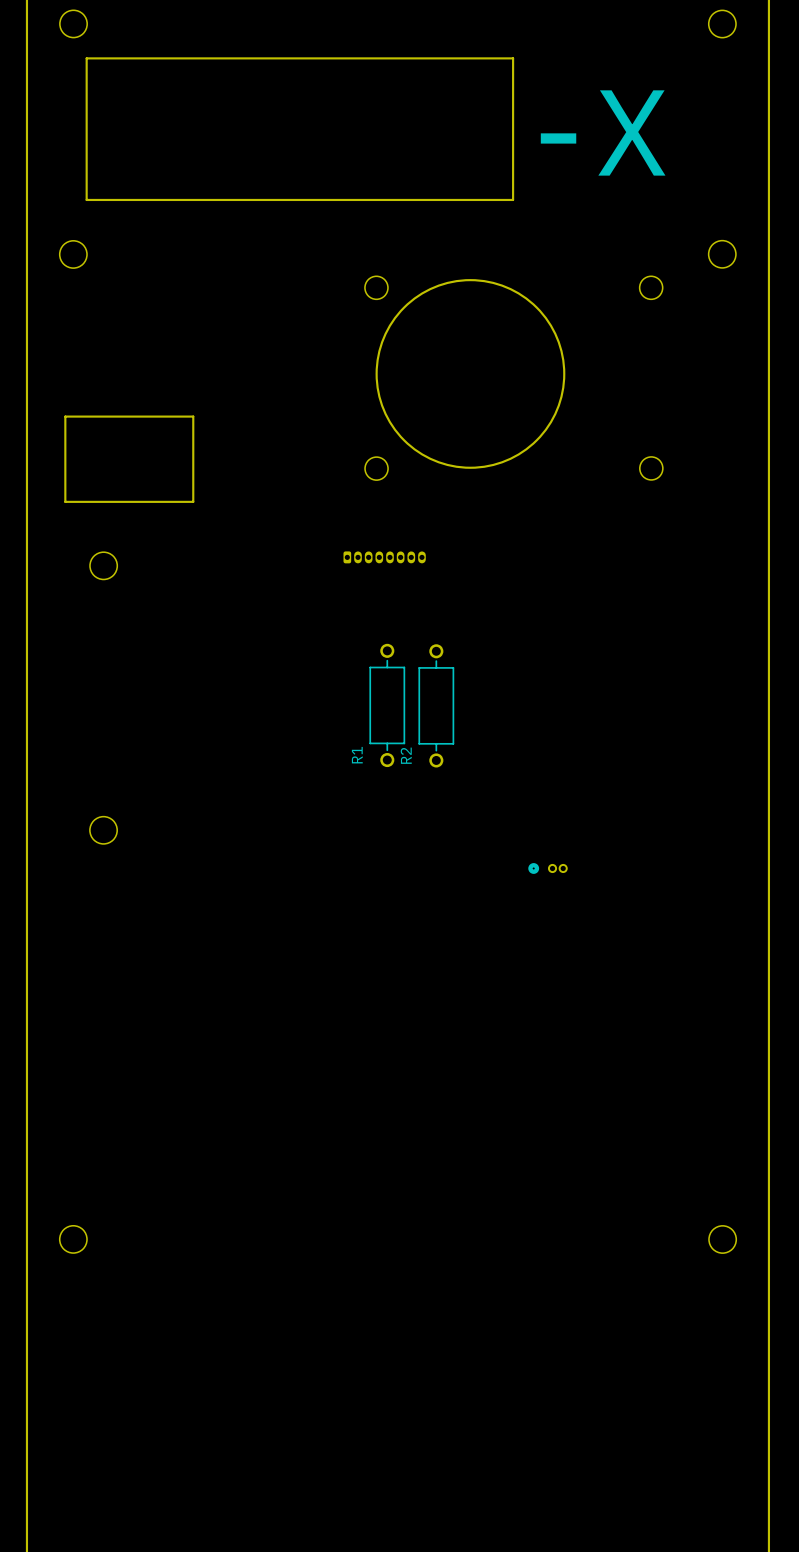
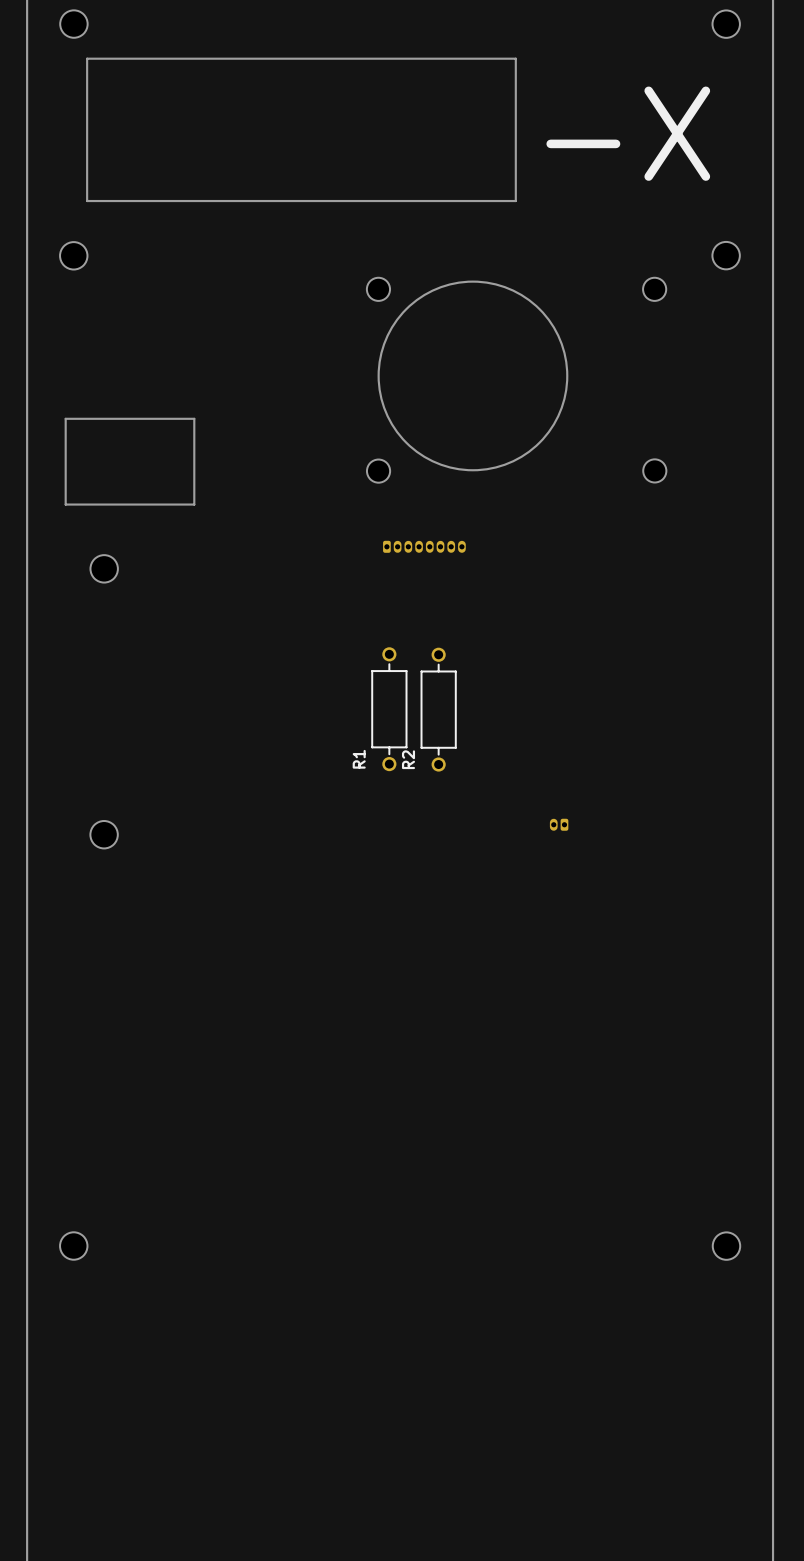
part position: (384, 557) -> (424, 546)
part: none -> (559, 824)
part: (548, 868) -> none

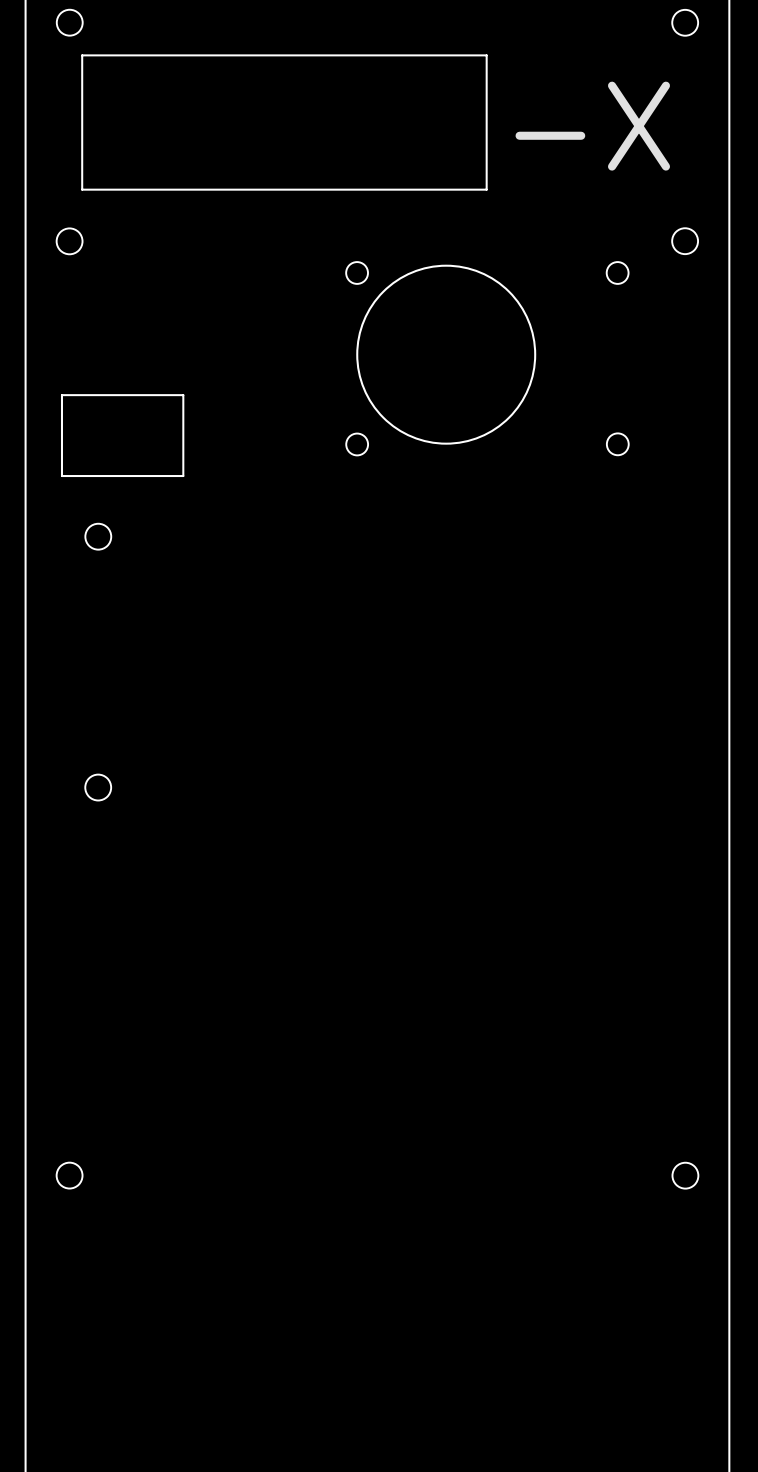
part: (424, 546) -> none
R1: (389, 709) -> none
R2: (438, 709) -> none
part: (559, 824) -> none

